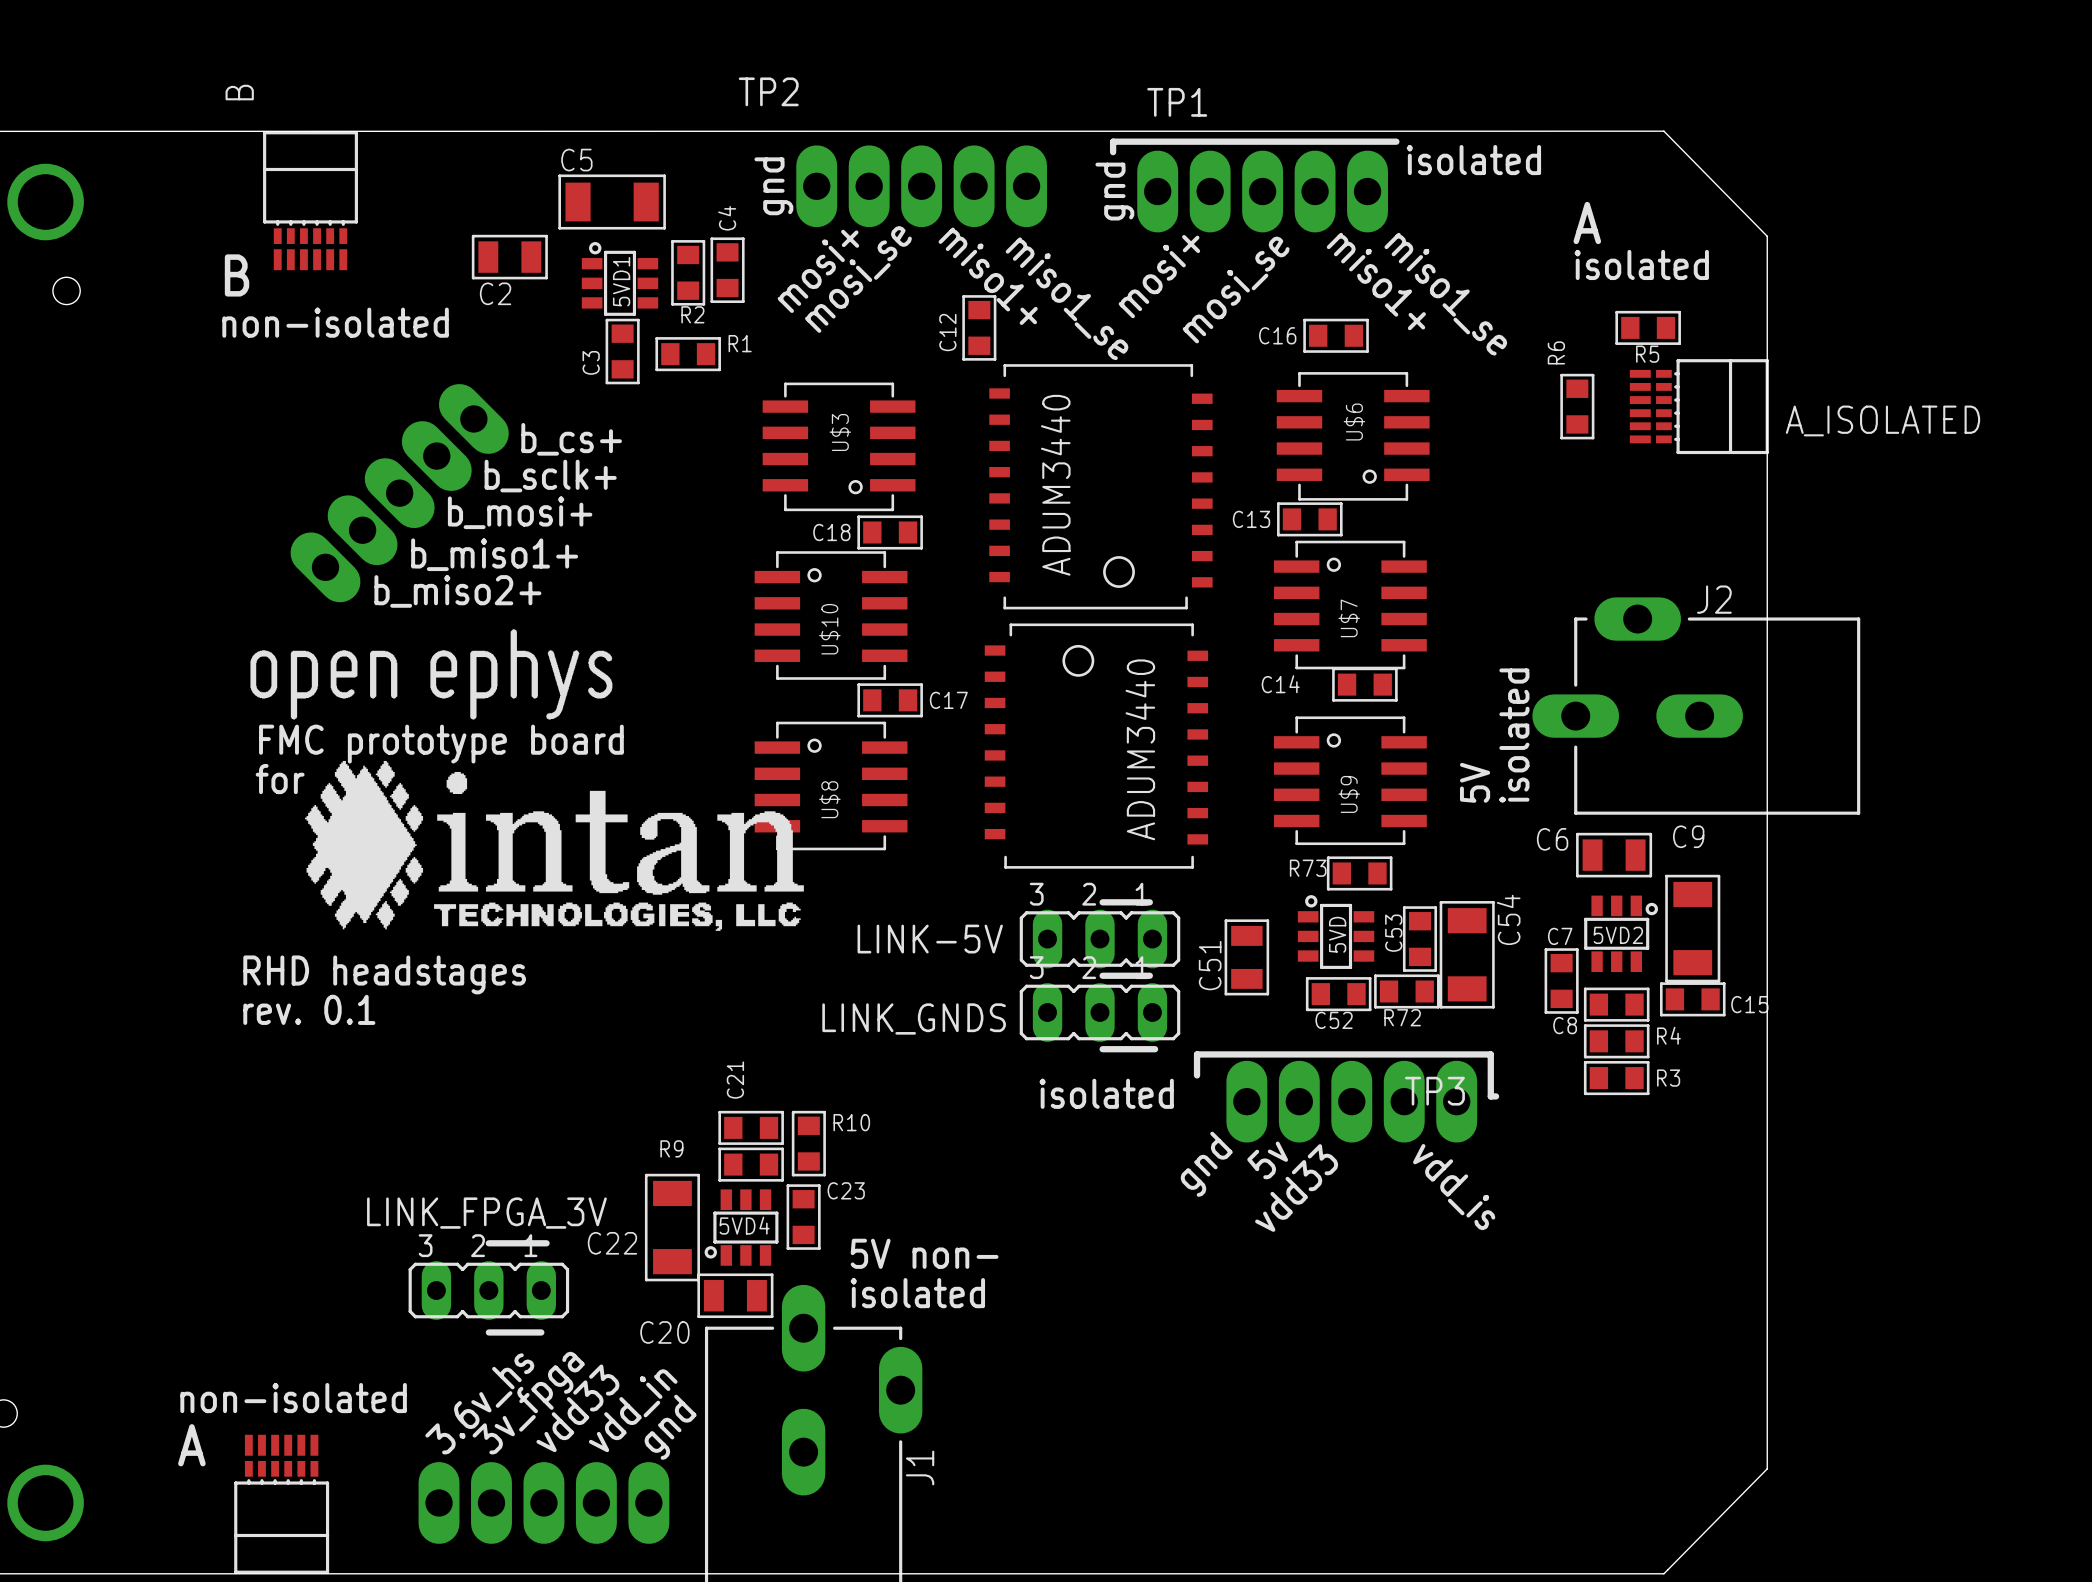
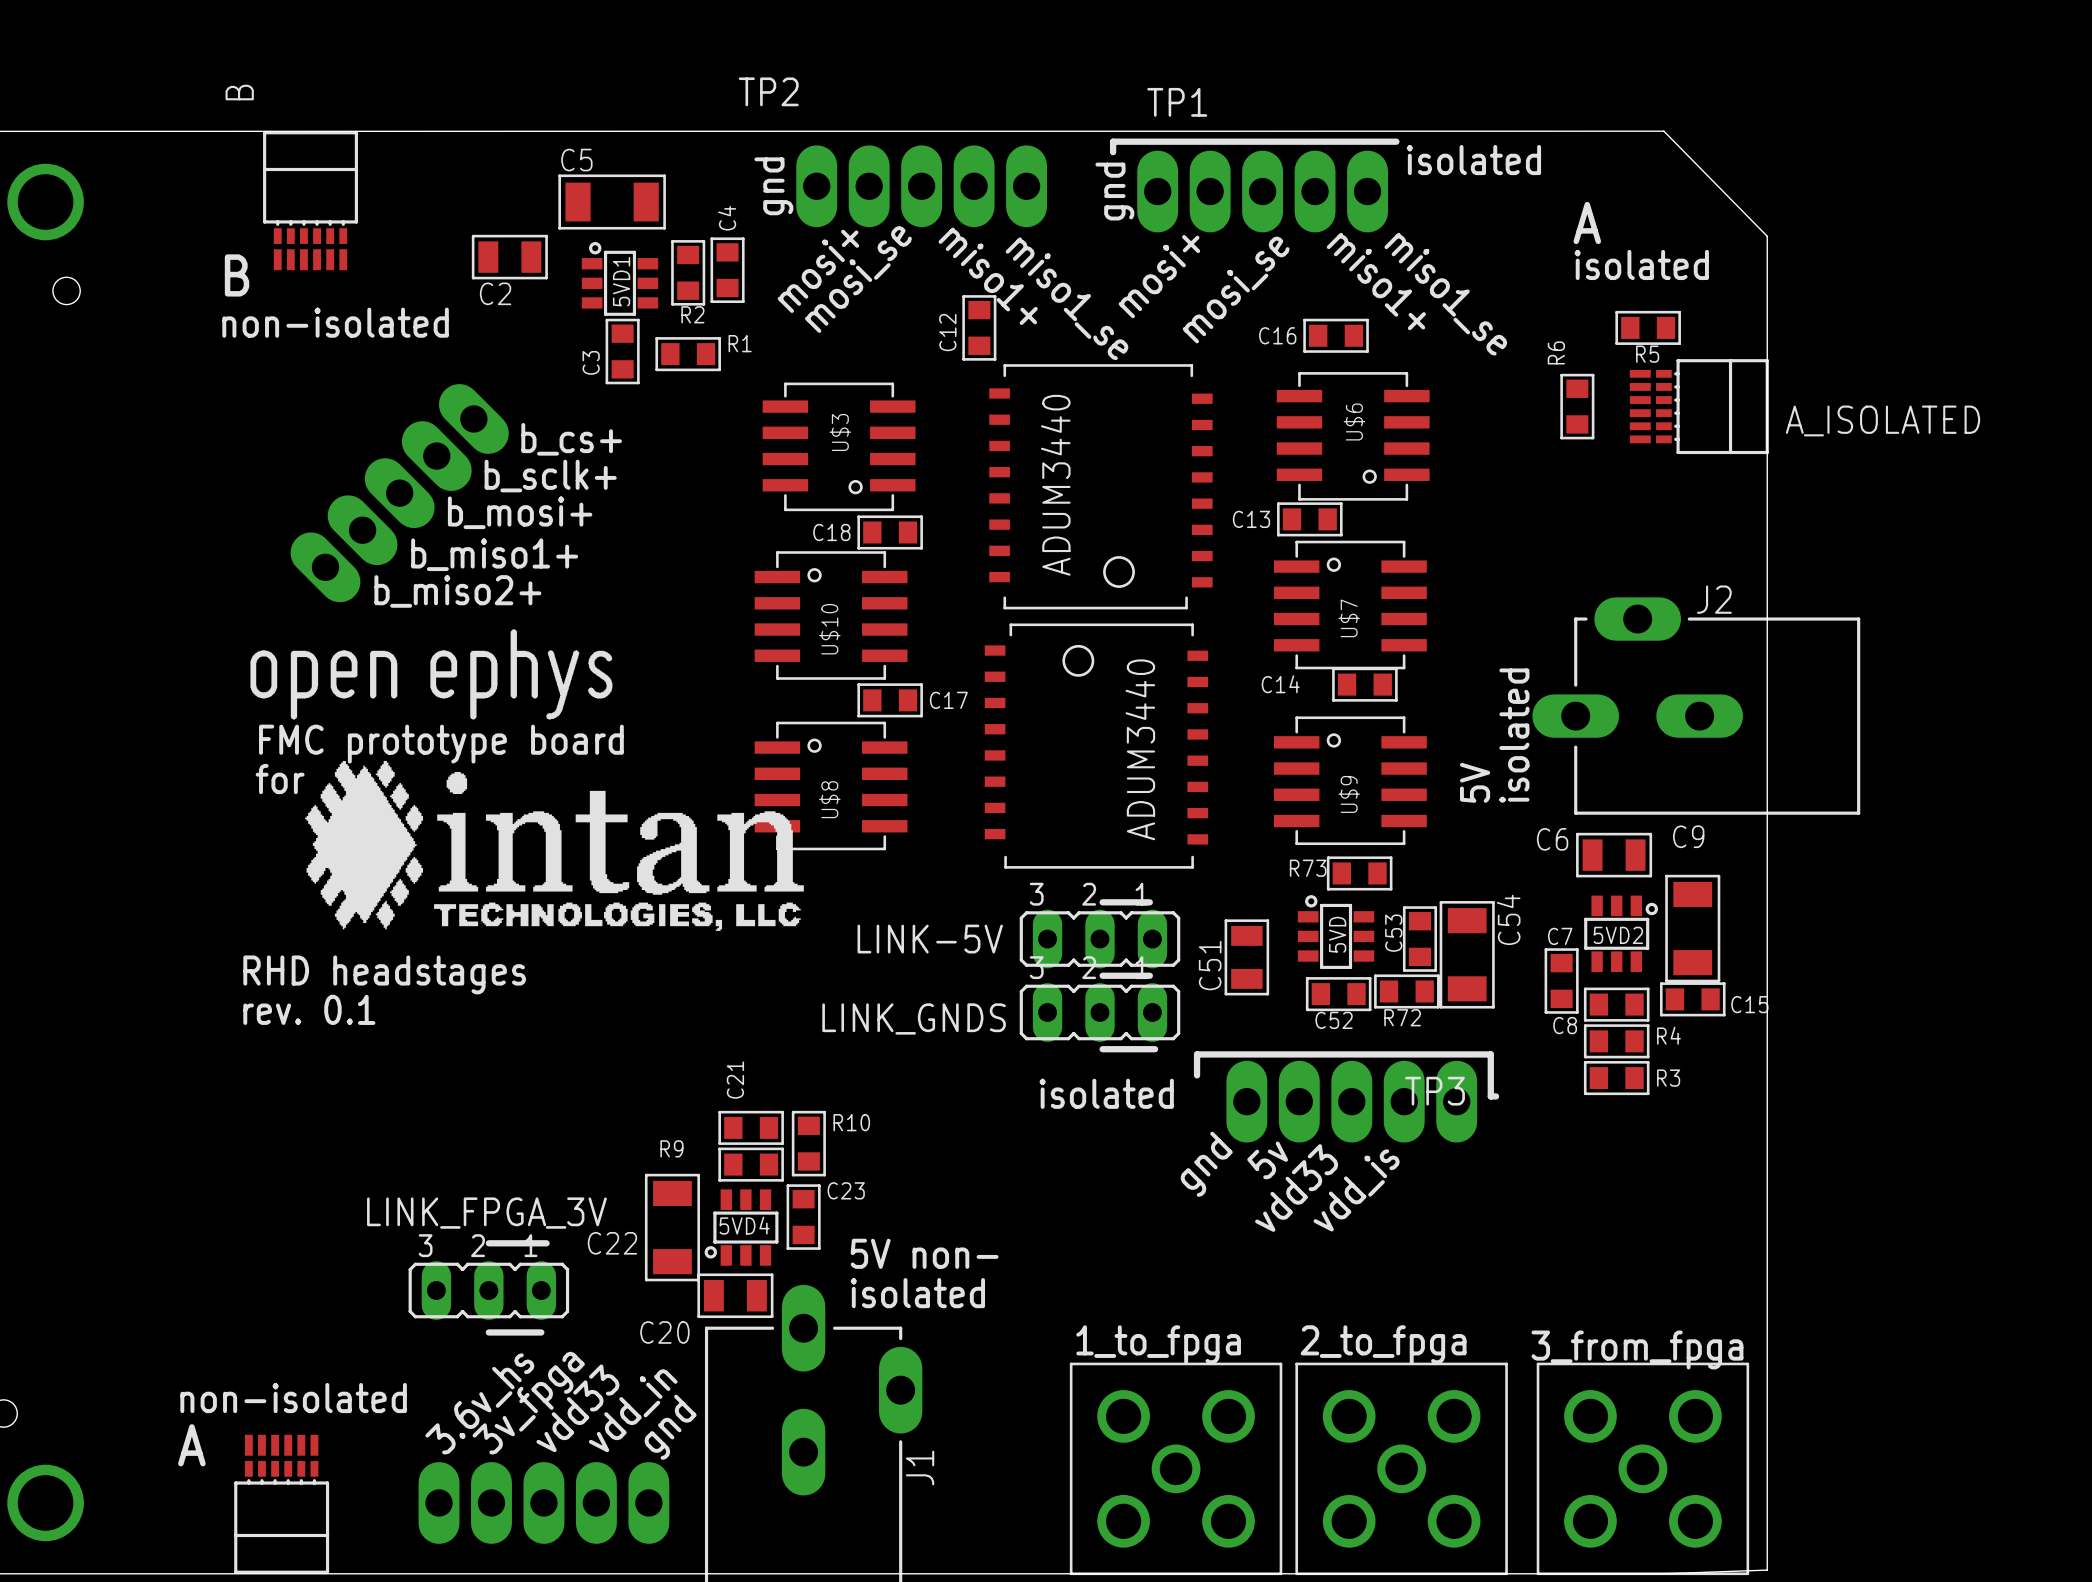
text rotation: 0° (1454, 1187) -> 90° counterclockwise (1356, 1190)
text: none -> 1_to_fpga (1158, 1344)
text: none -> 2_to_fpga (1383, 1344)
text: none -> 3_from_fpga (1637, 1349)
part: none -> (1176, 1468)
part: none -> (1401, 1468)
part: none -> (1642, 1468)
board edge: (1767, 1468) (1663, 1573) -> (1767, 1468) (1767, 1570) (1663, 1573)

